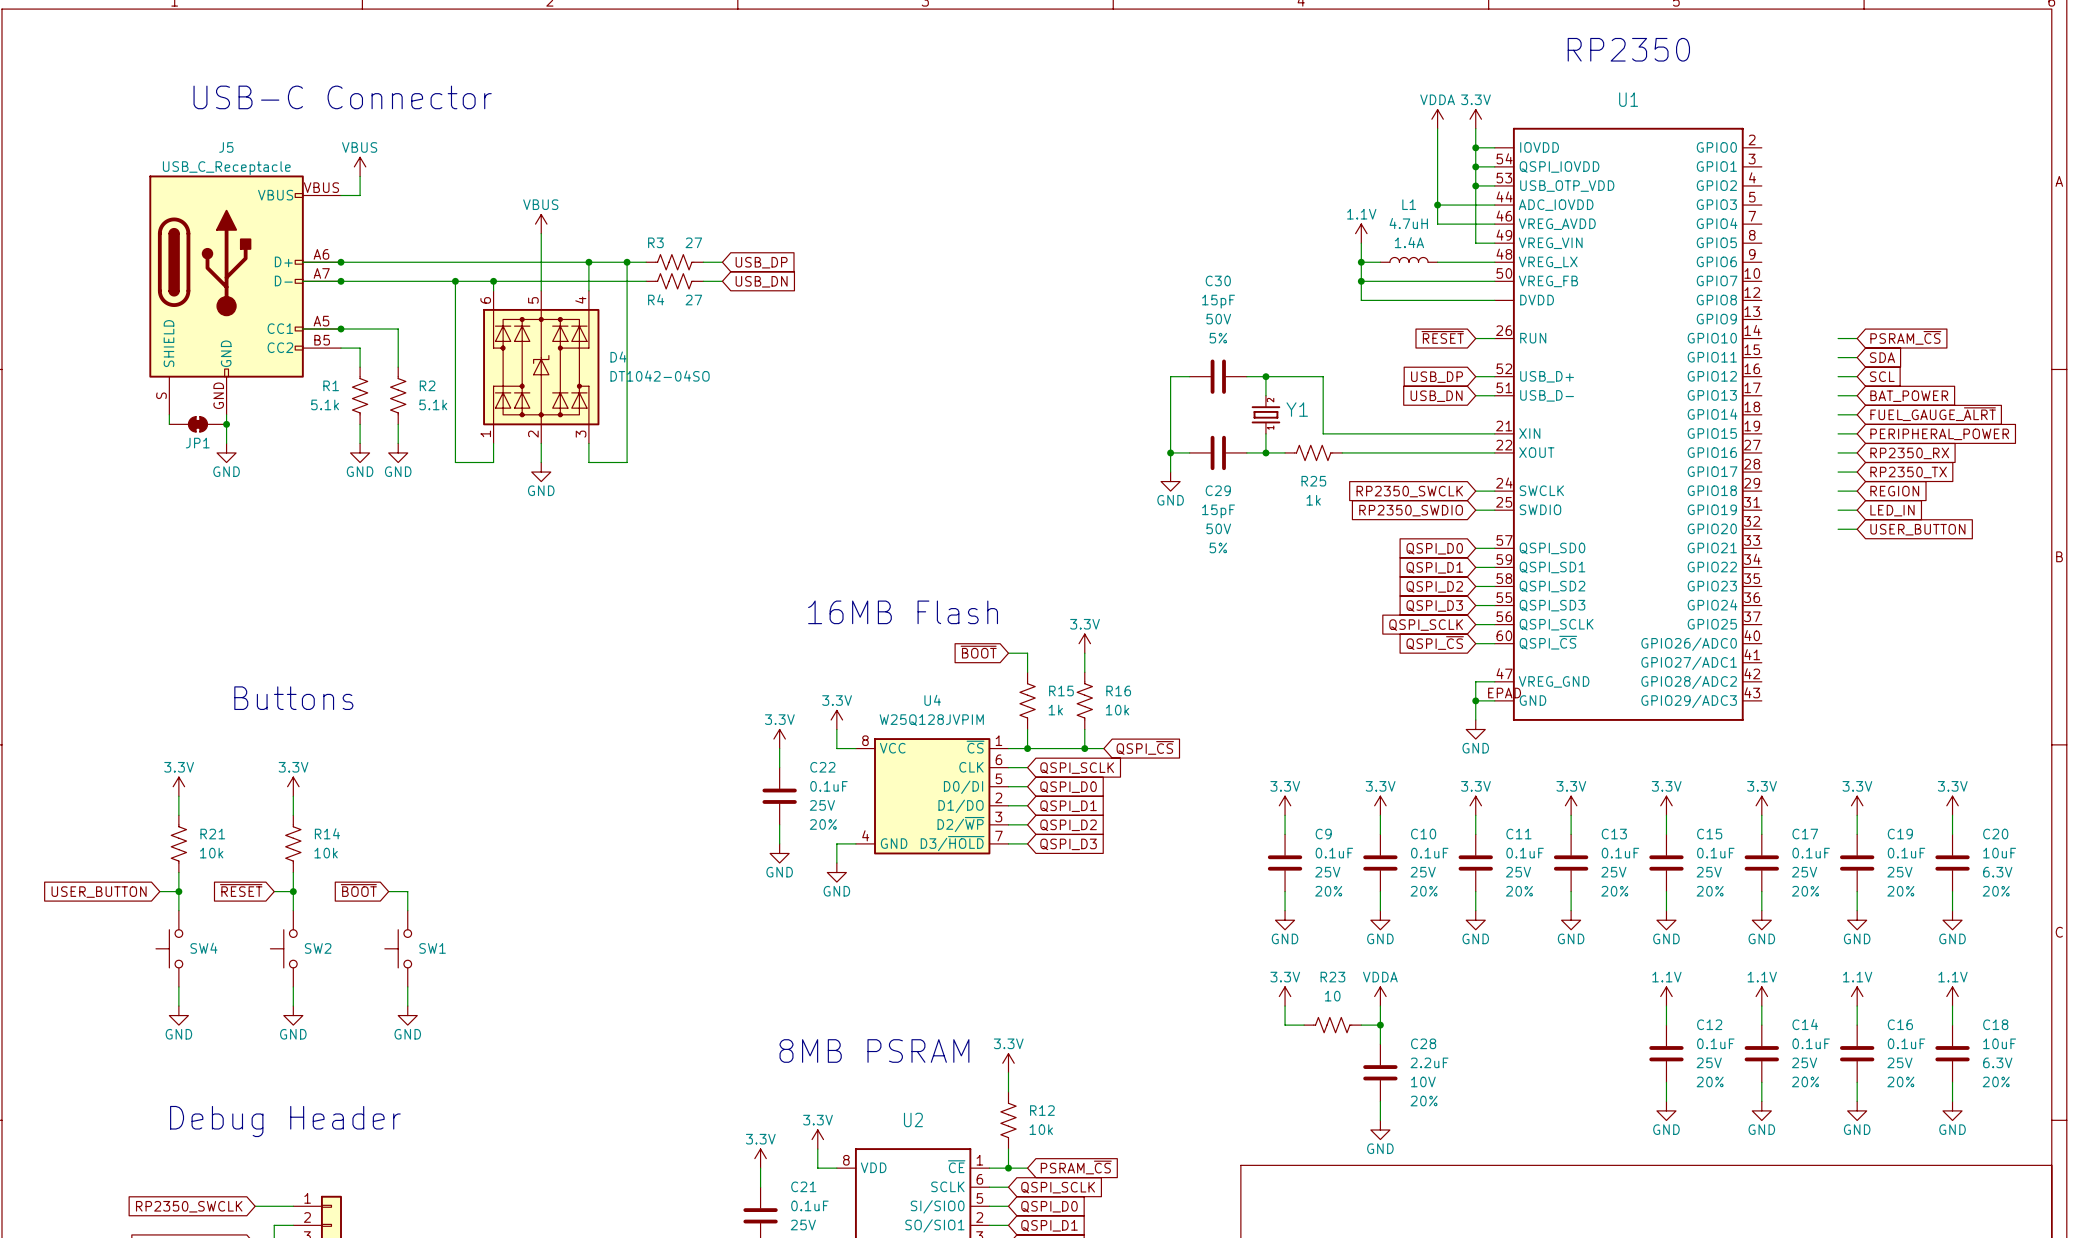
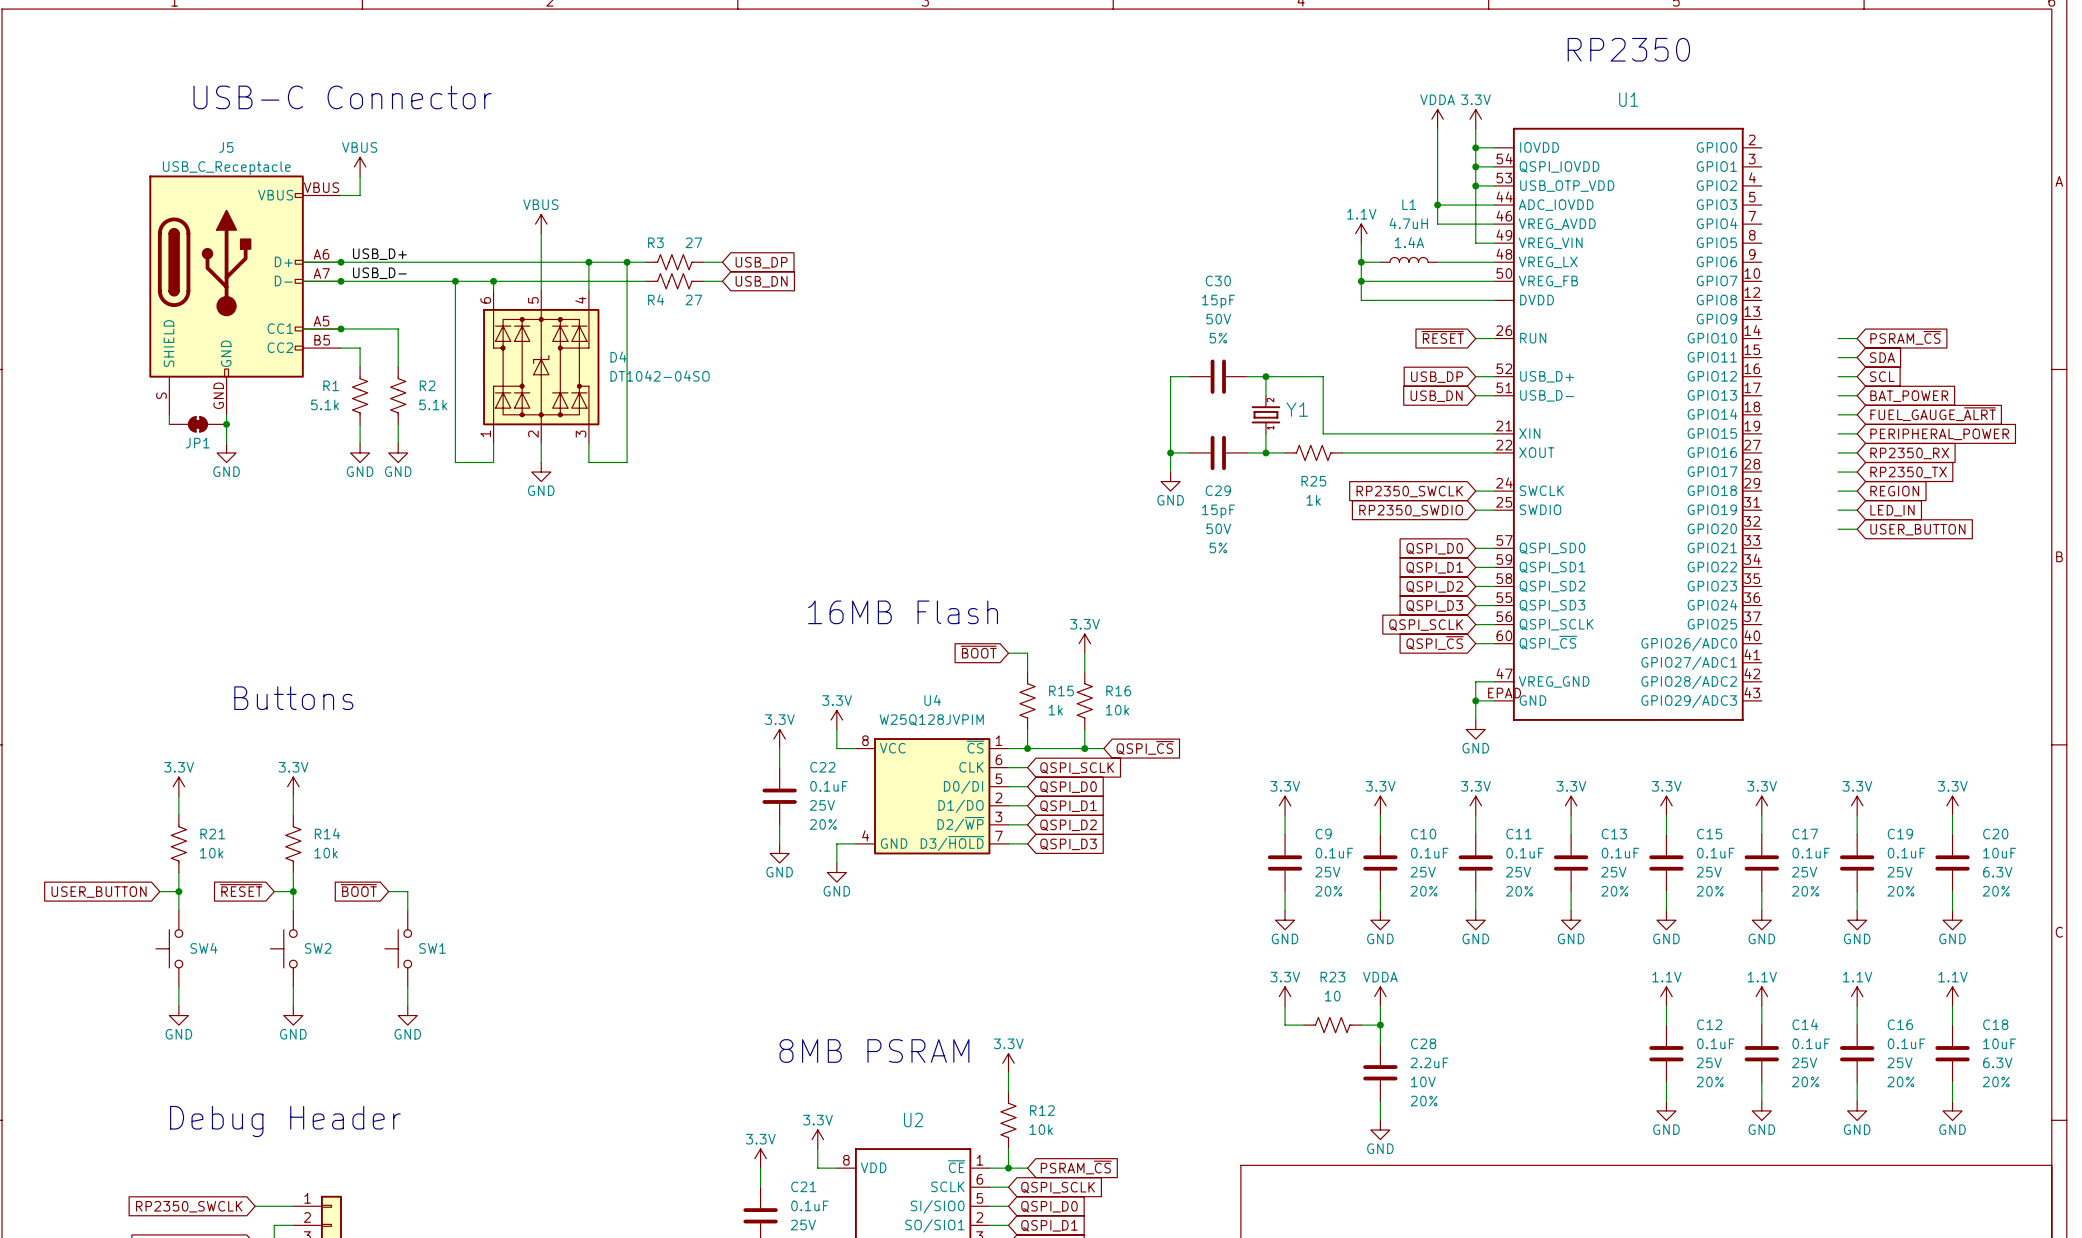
label: none -> USB_D+ (379, 254)
label: none -> USB_D- (379, 273)

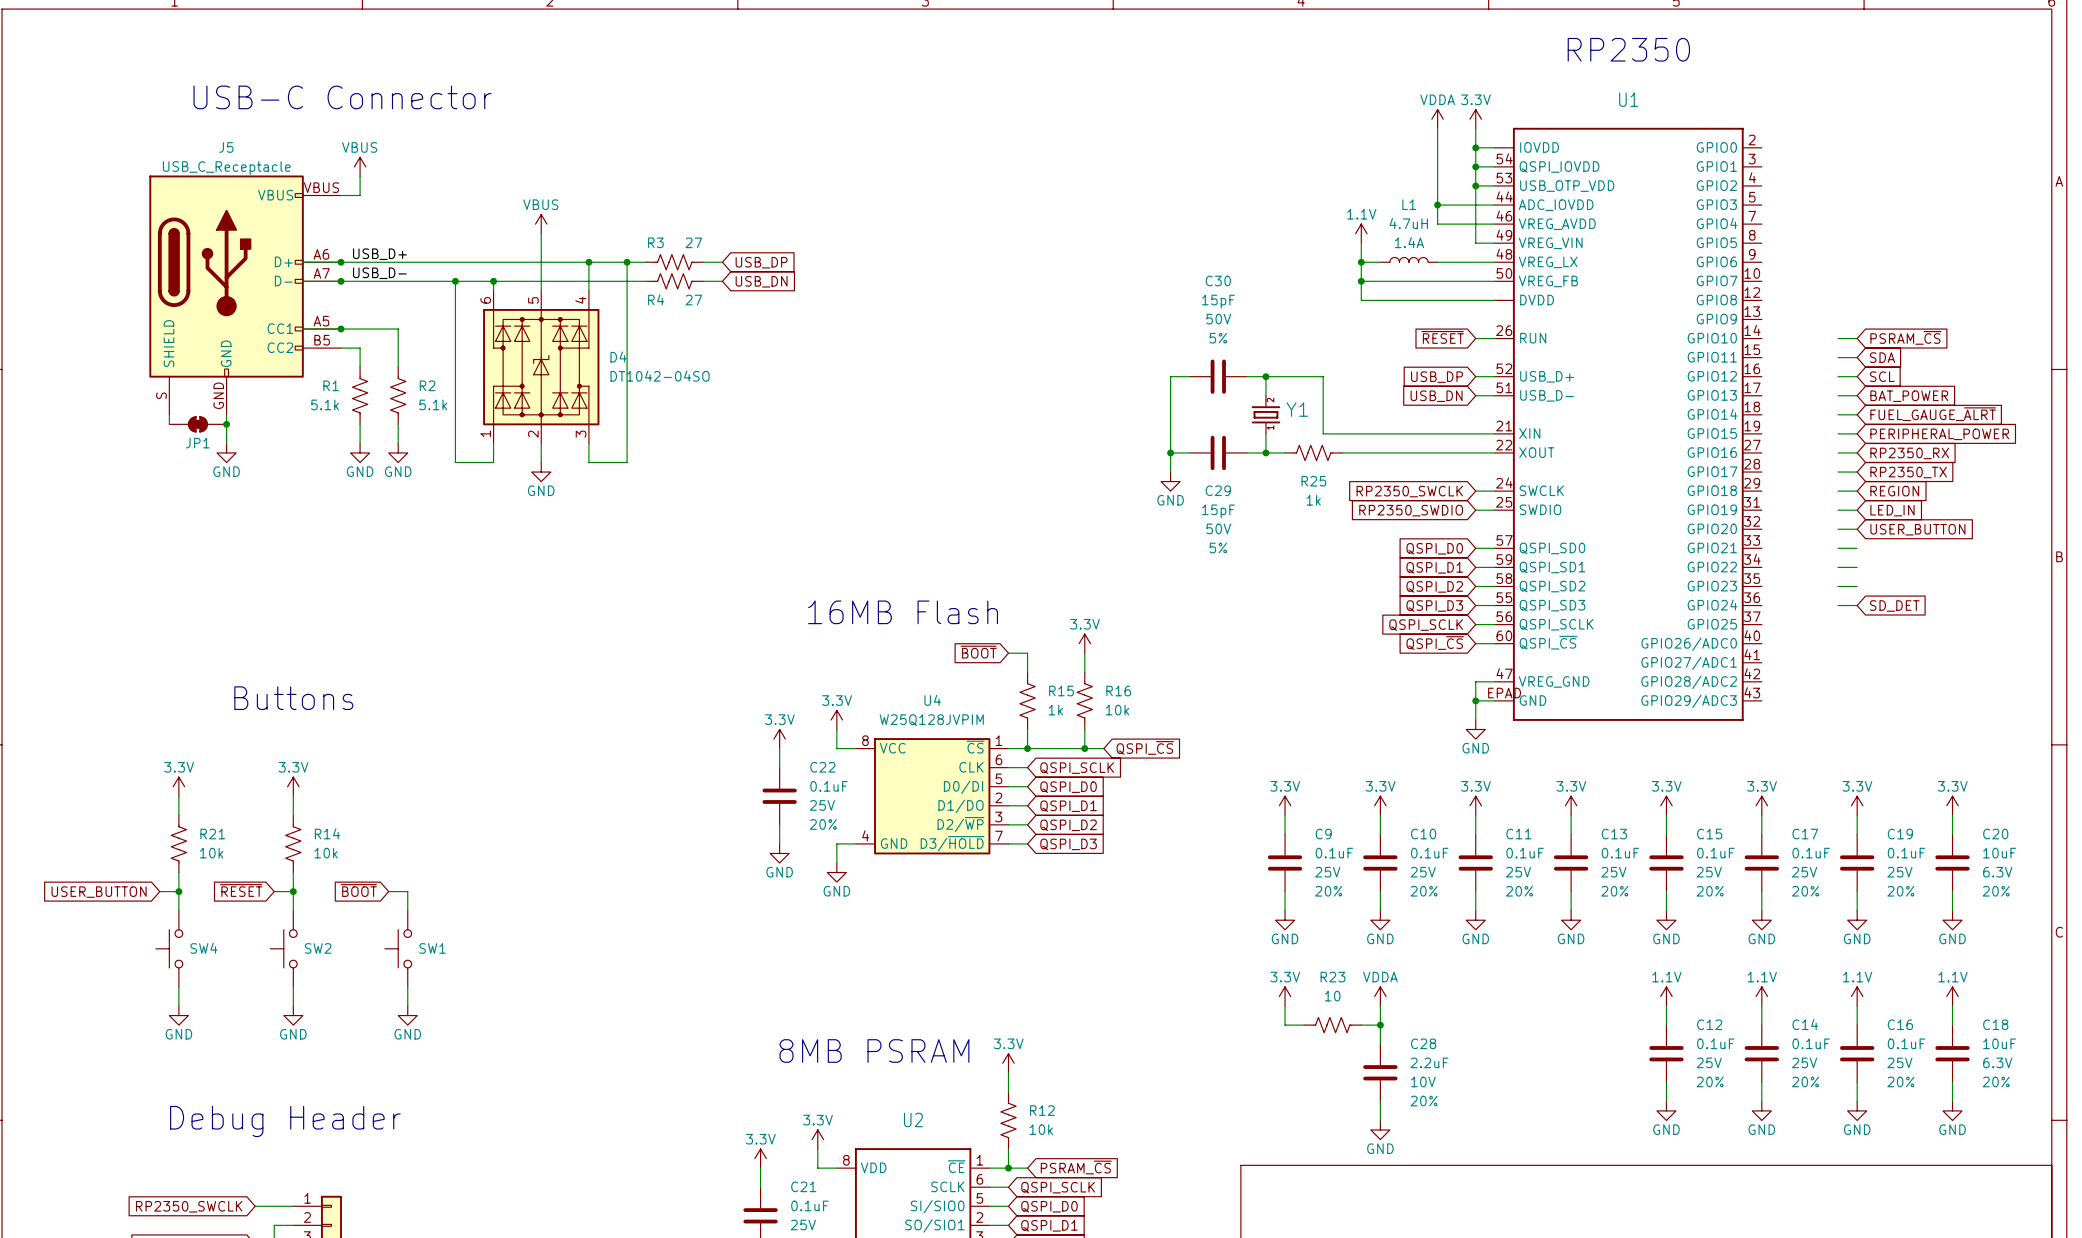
wire: none -> (1838, 548) (1857, 548)
wire: none -> (1838, 567) (1857, 567)
wire: none -> (1838, 586) (1857, 586)
wire: none -> (1838, 605) (1857, 605)
global label: none -> SD_DET (1894, 605)

